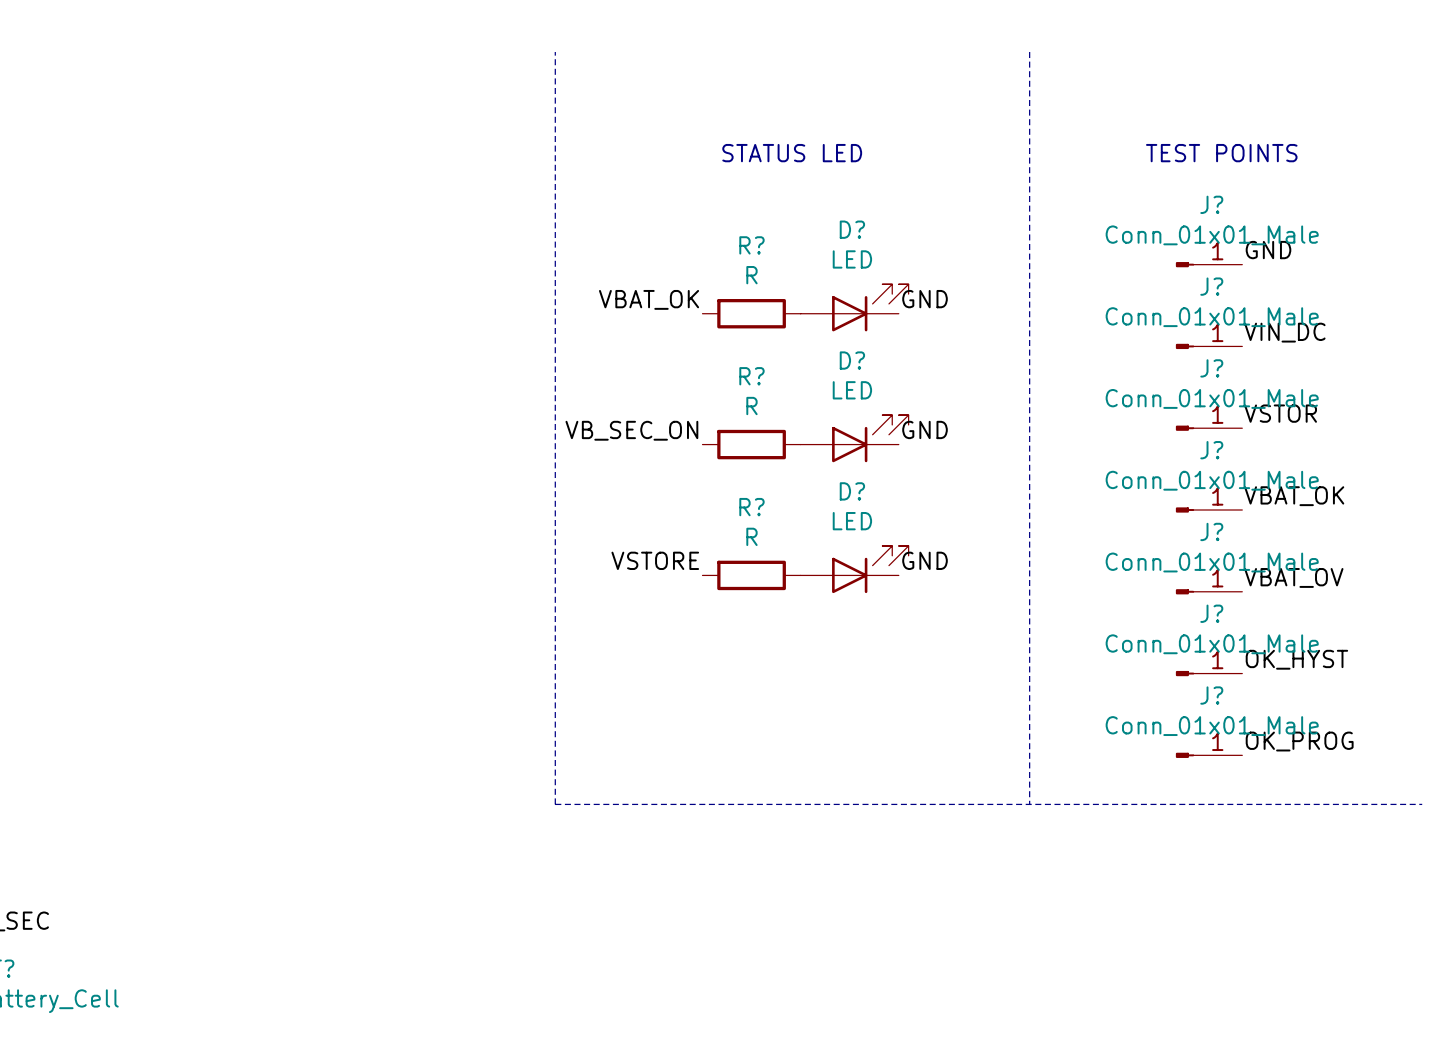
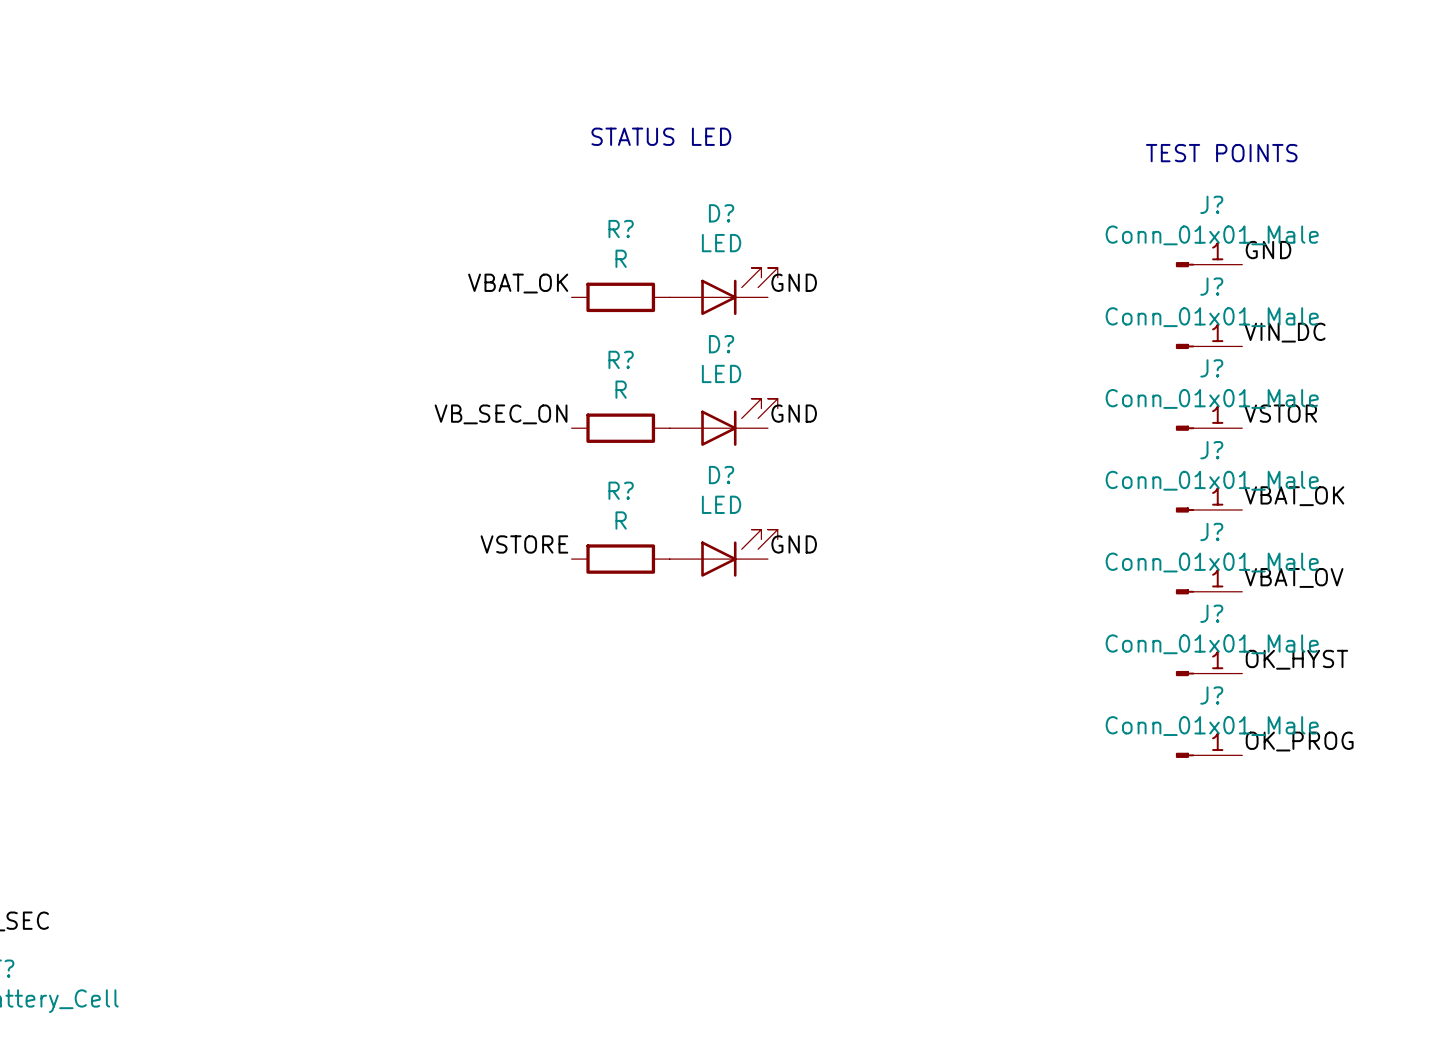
line: (555, 52) (555, 804) (1422, 804) -> none
line: (1029, 52) (1029, 804) -> none
text position: STATUS LED (792, 153) -> STATUS LED (661, 136)
label: none -> GND (794, 282)
D?: none -> LED (723, 291)
R?: none -> R (620, 297)
label position: VBAT_OK (649, 299) -> VBAT_OK (518, 283)
label: GND (925, 299) -> none
D?: LED (854, 307) -> none
R?: R (751, 313) -> none
label: none -> GND (794, 413)
D?: none -> LED (723, 422)
R?: none -> R (620, 428)
label: GND (925, 429) -> none
label position: VB_SEC_ON (631, 430) -> VB_SEC_ON (501, 414)
D?: LED (854, 438) -> none
R?: R (751, 444) -> none
label: none -> GND (794, 544)
D?: none -> LED (723, 553)
R?: none -> R (620, 559)
label position: VSTORE (655, 560) -> VSTORE (524, 544)
label: GND (925, 560) -> none
D?: LED (854, 569) -> none
R?: R (751, 575) -> none

